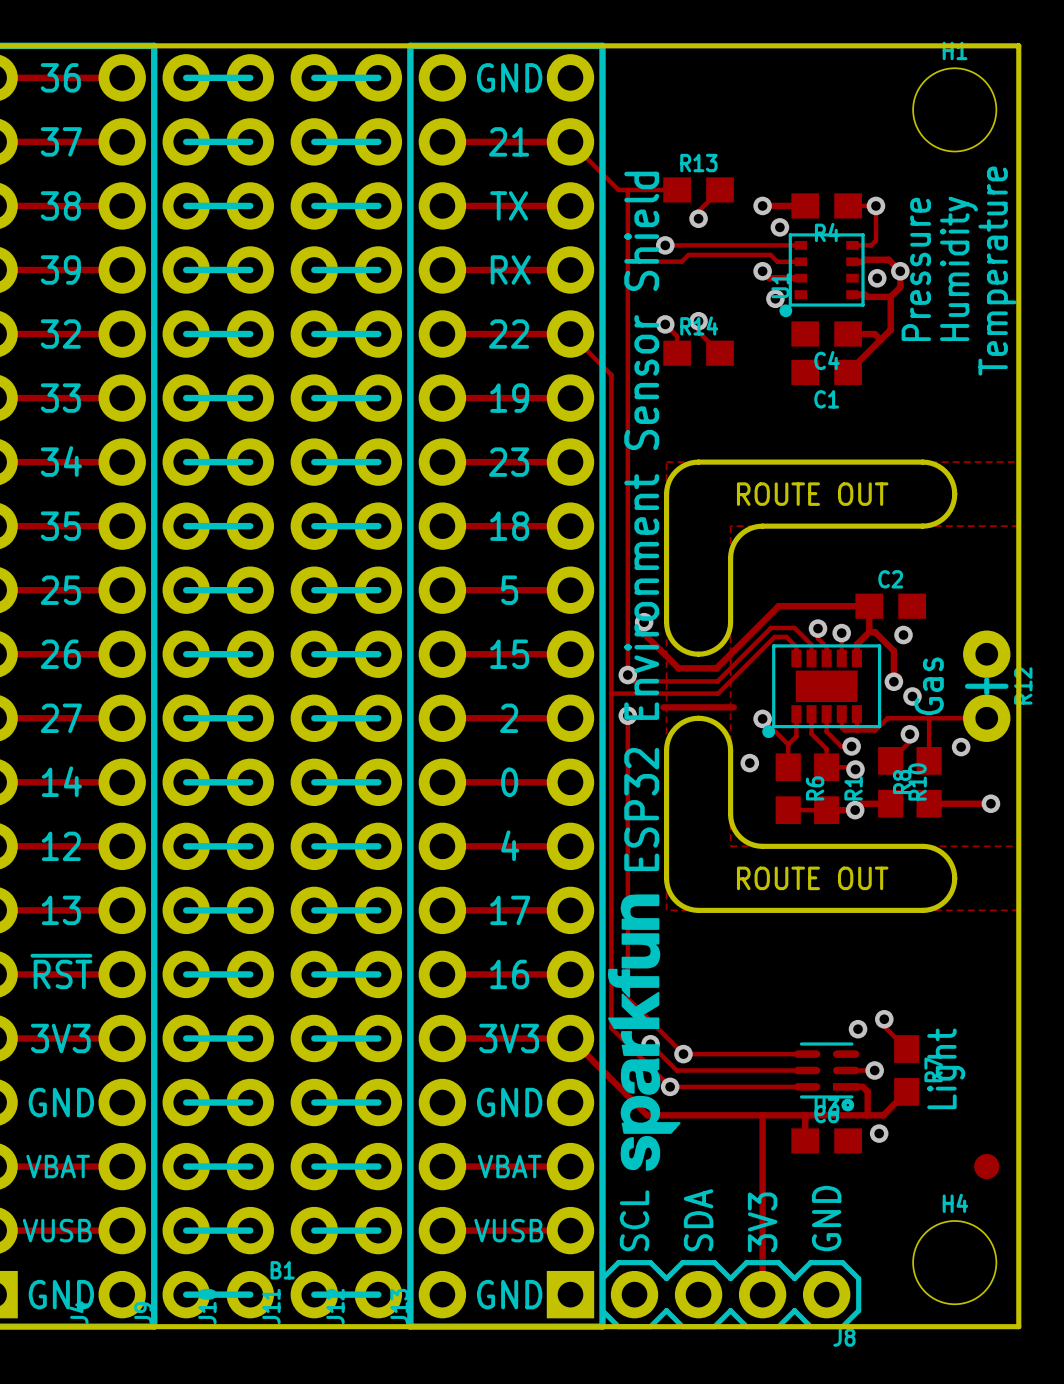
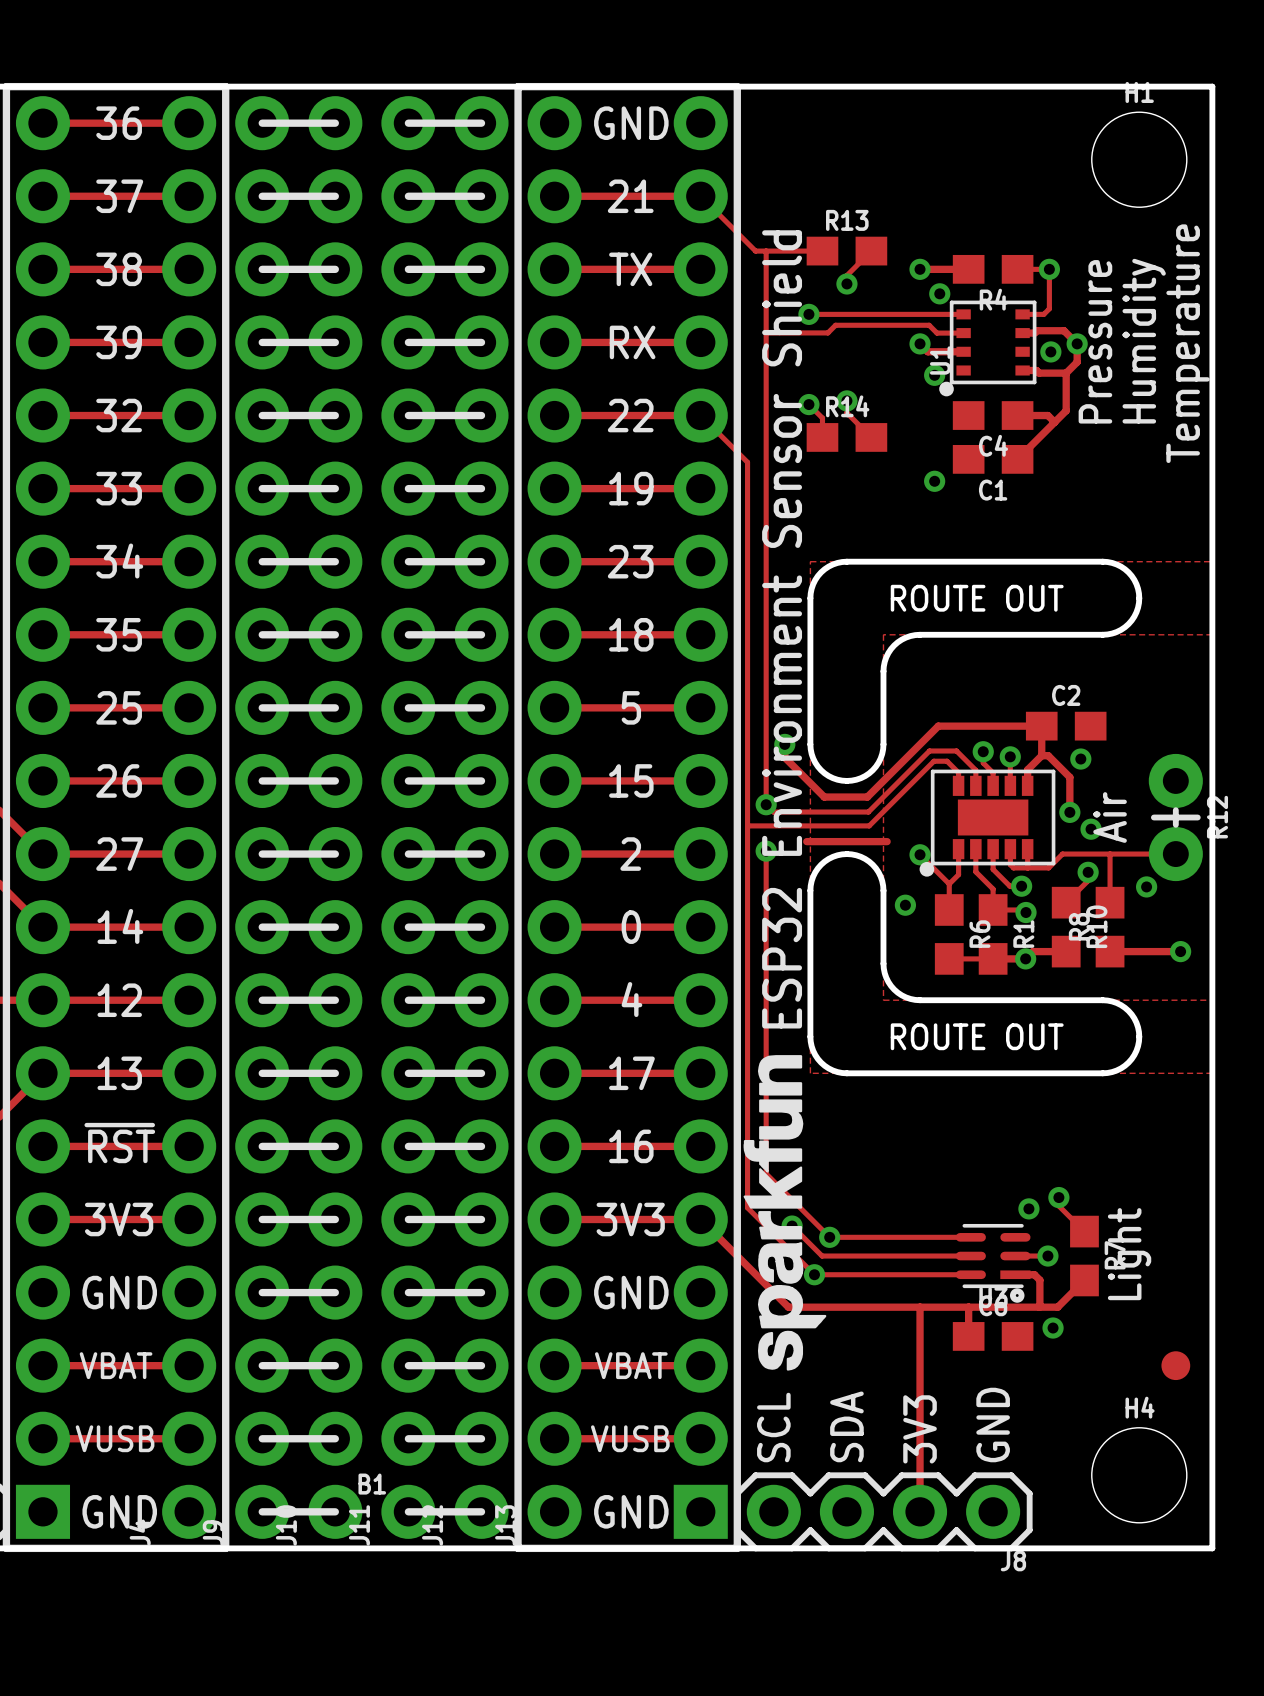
via: none -> (934, 481)
text: Gas (929, 686) -> Air (1110, 817)

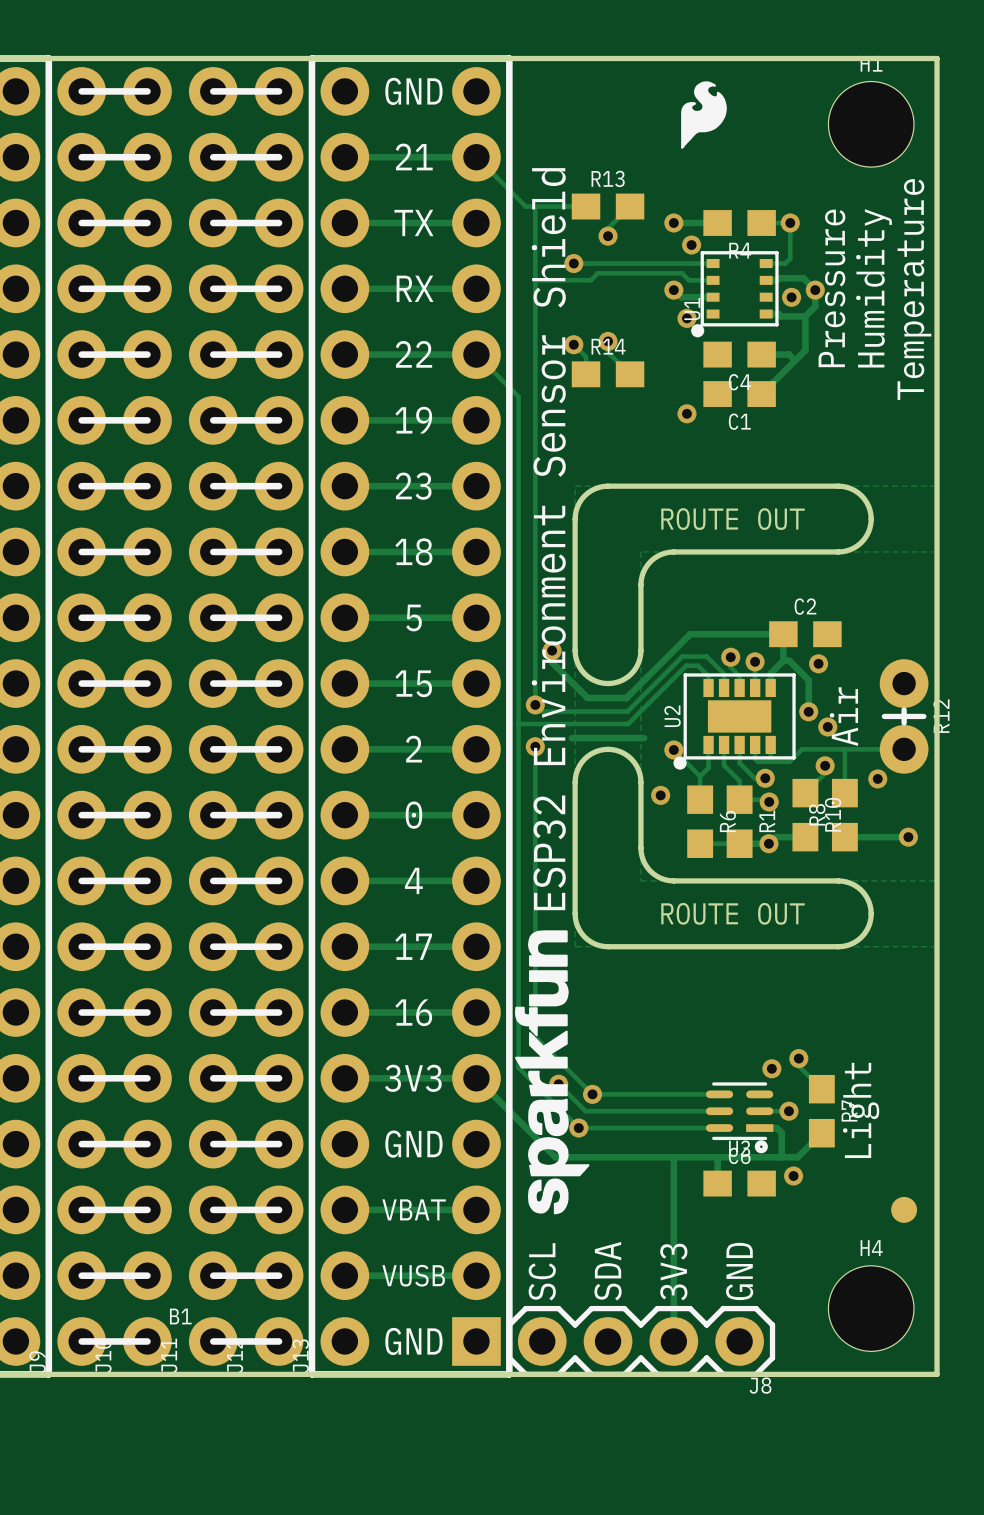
drawing: none -> [681, 81, 727, 149]
U2 name: none -> U2 (672, 716)

